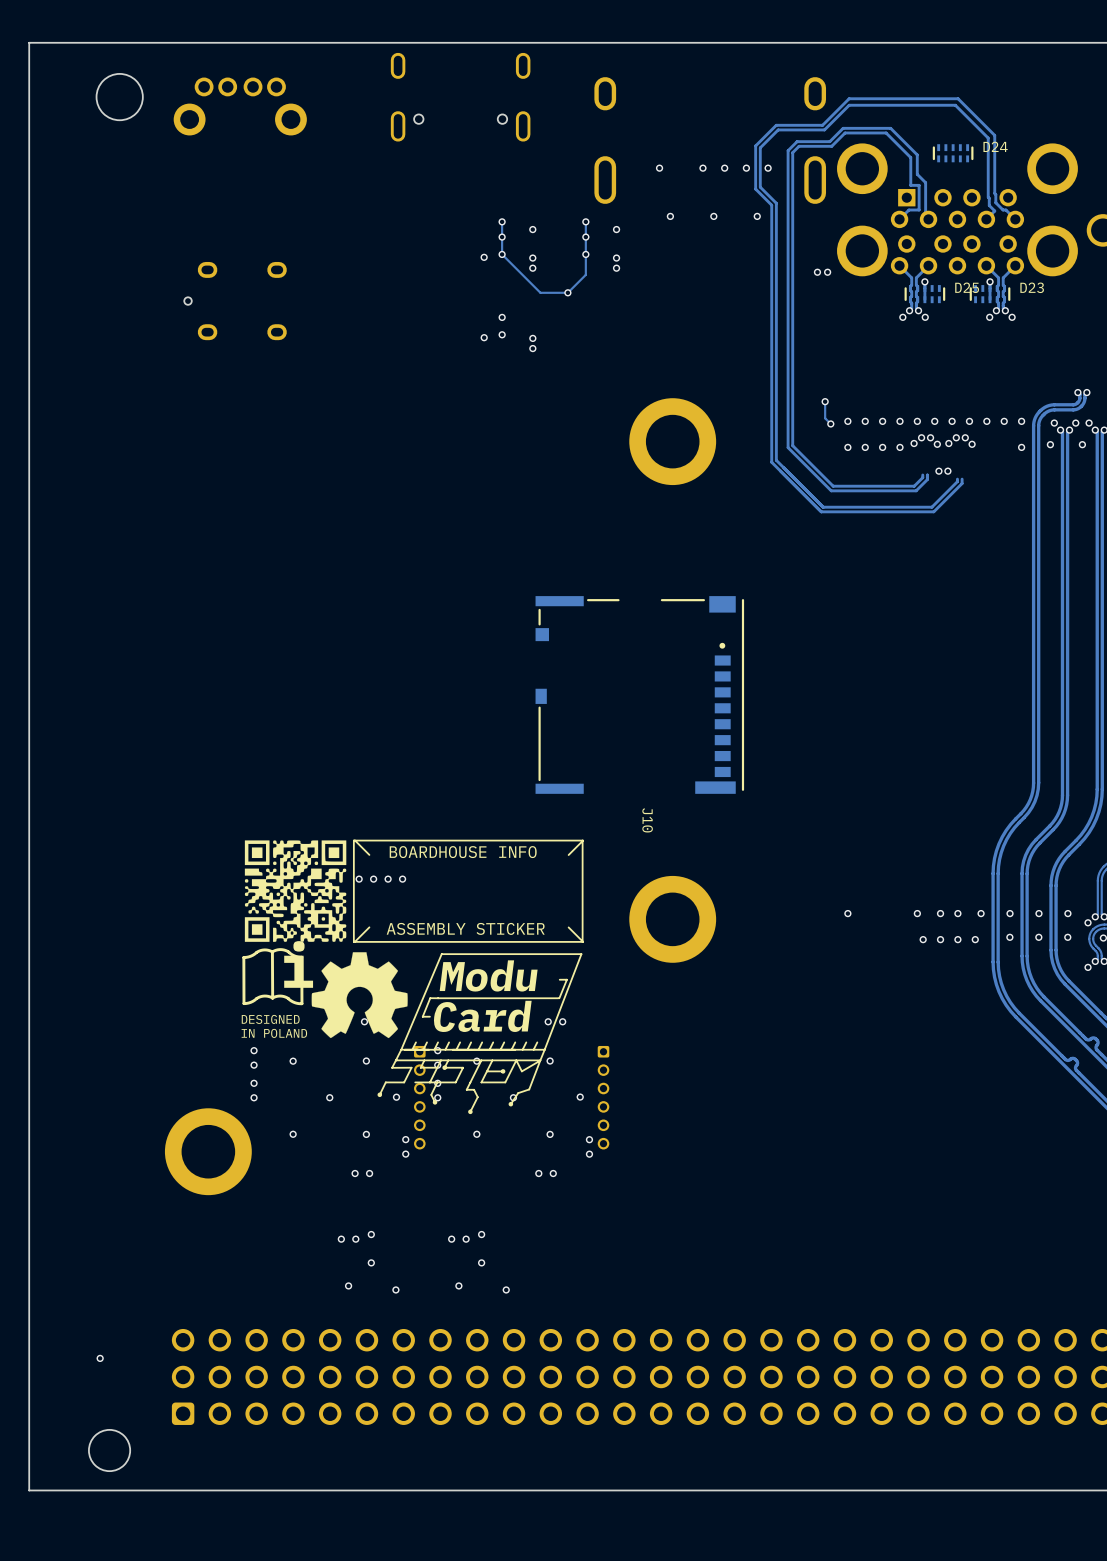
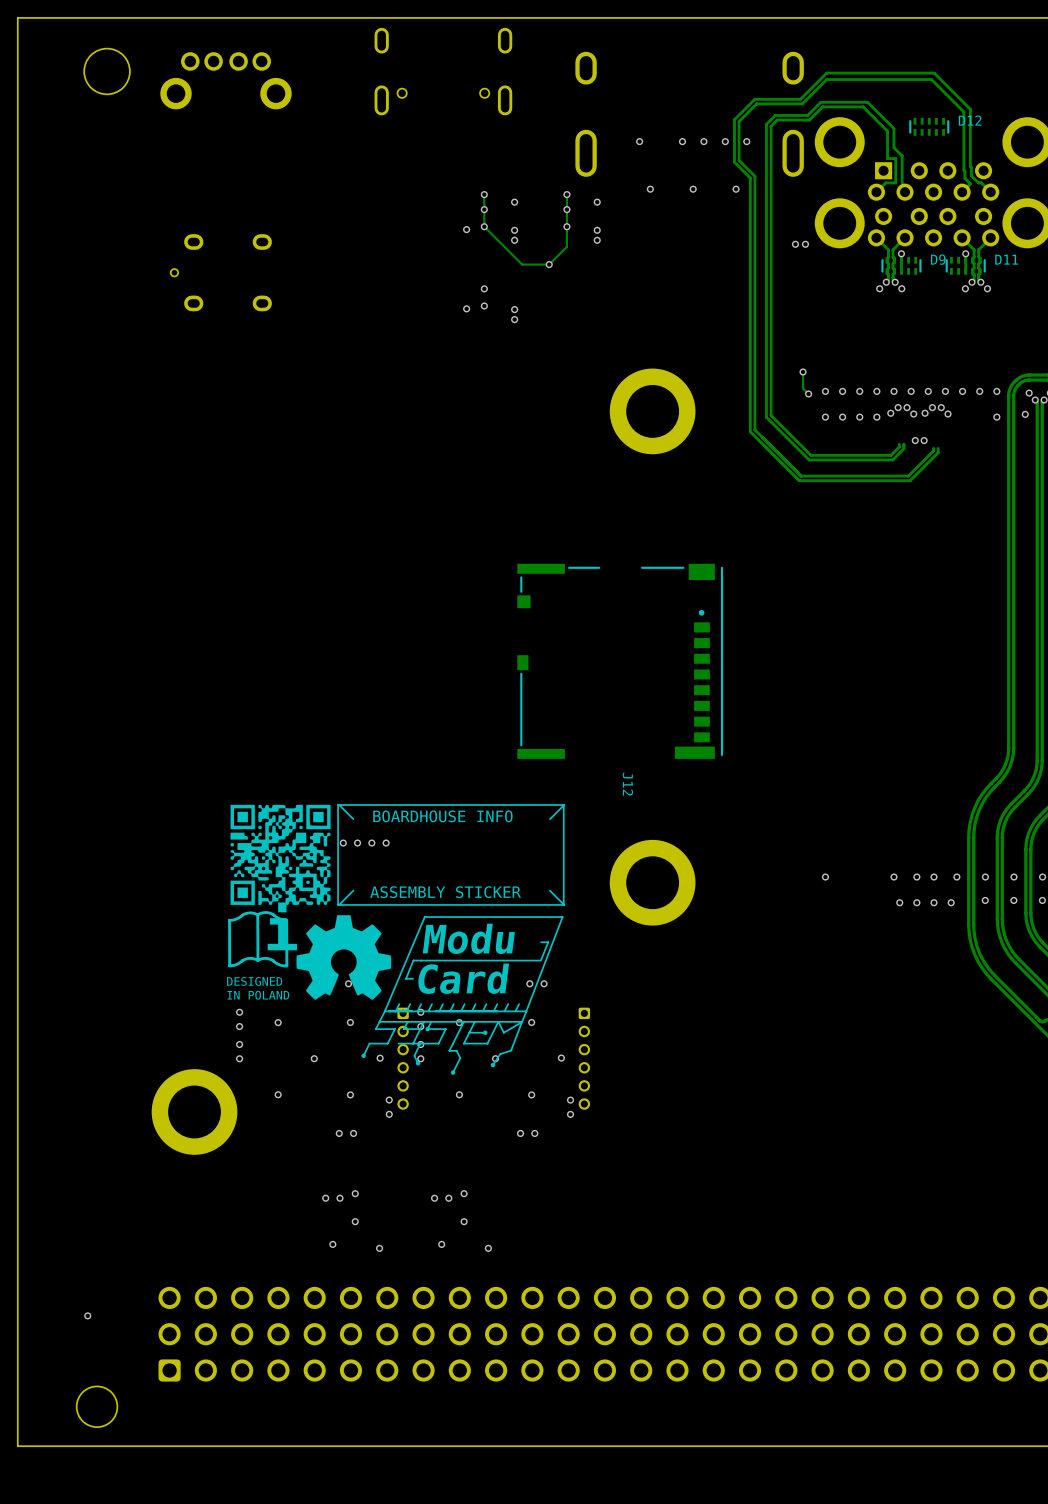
D24 name: D24 (995, 146) -> D12 (970, 120)
D25 name: D25 (967, 287) -> D9 (938, 259)
D23 name: D23 (1032, 287) -> D11 (1006, 259)
J10 name: J10 (647, 820) -> J12 (627, 784)

